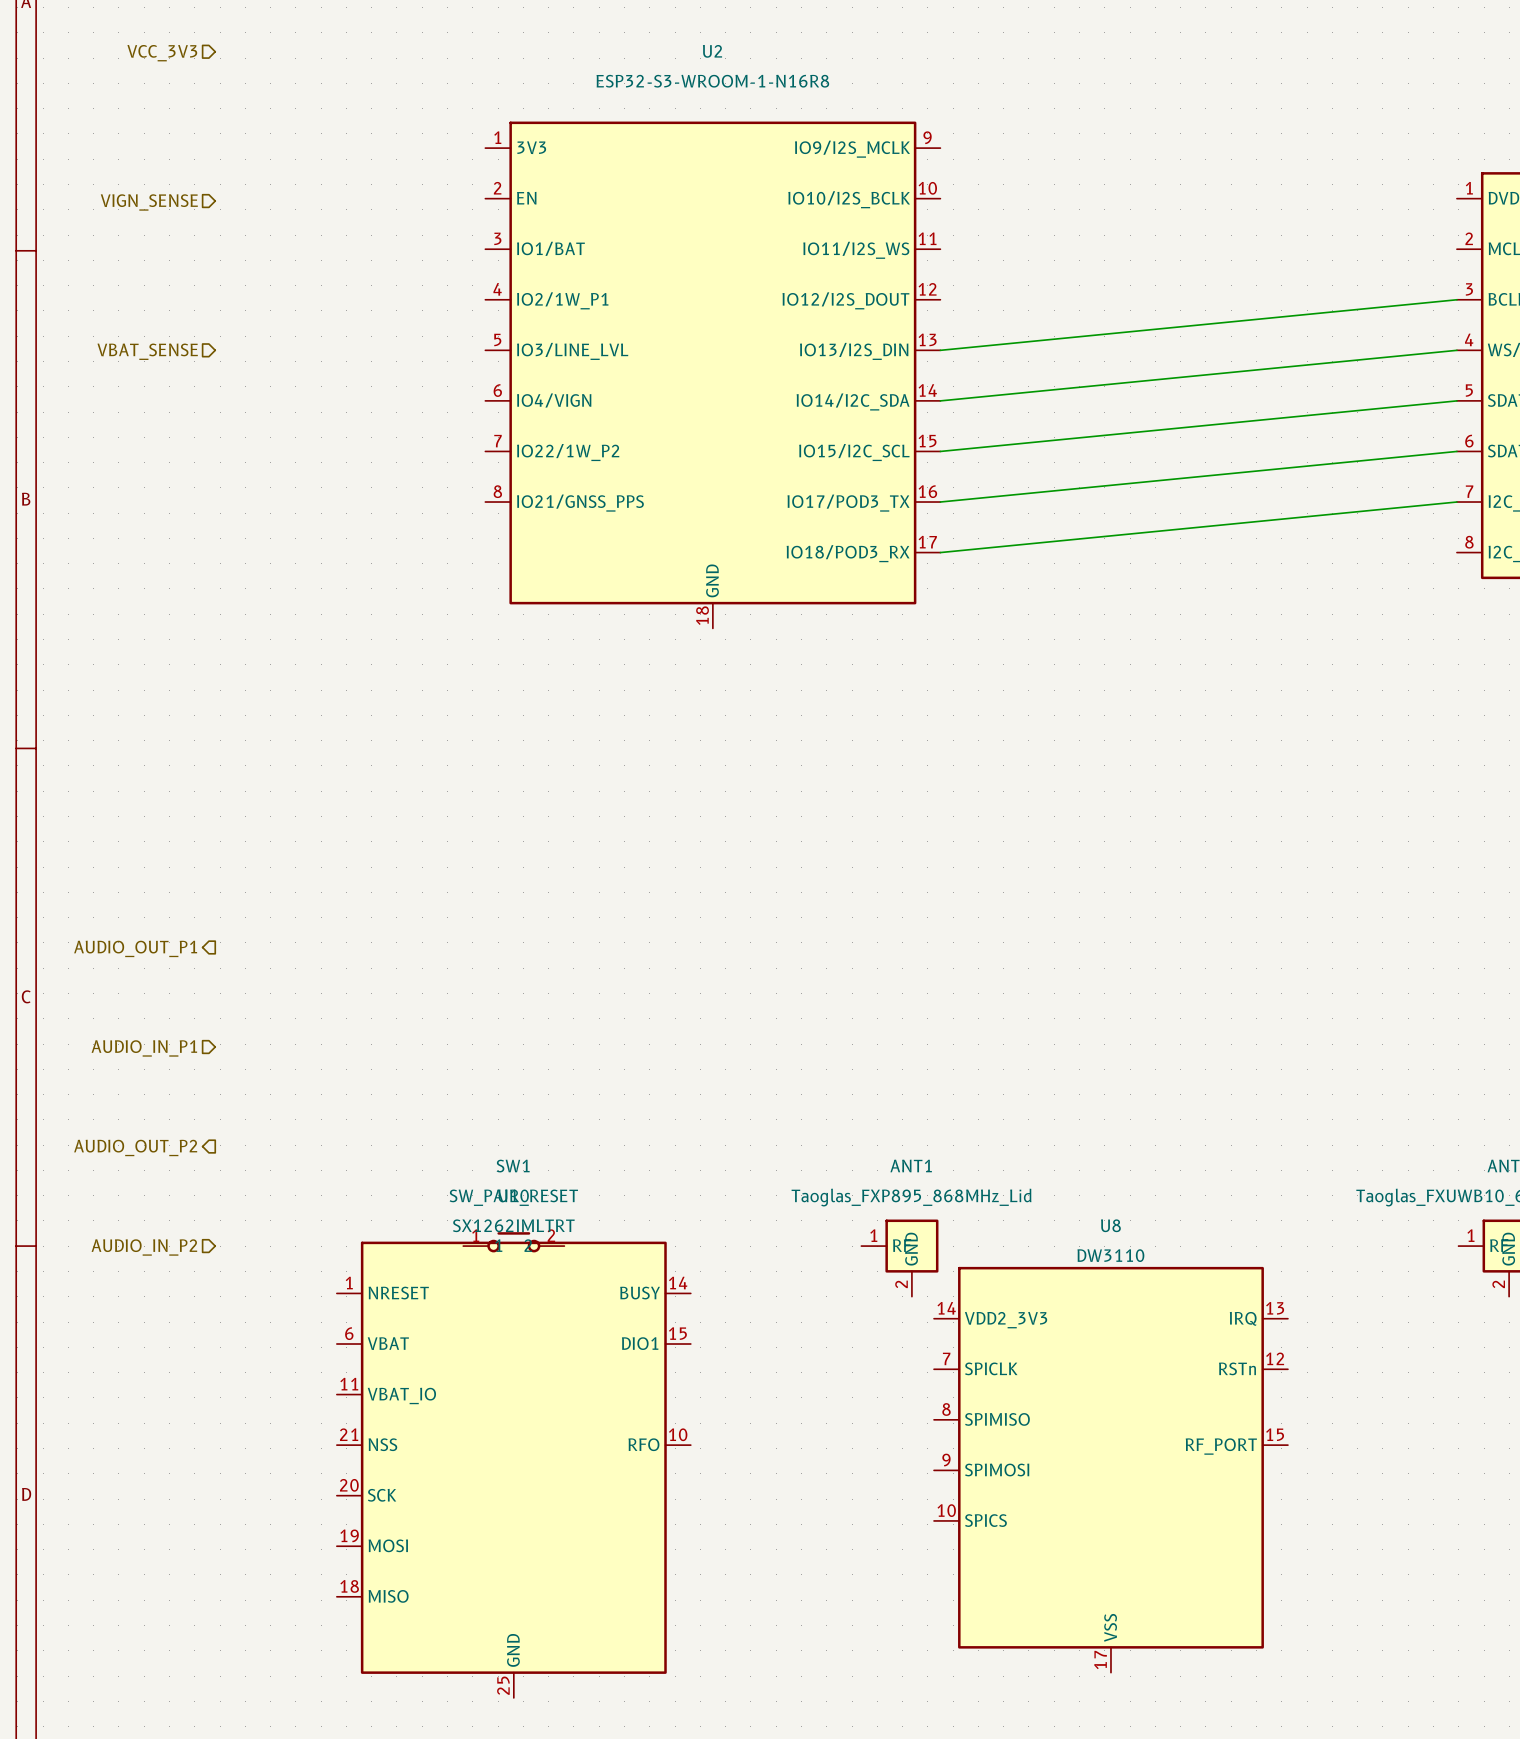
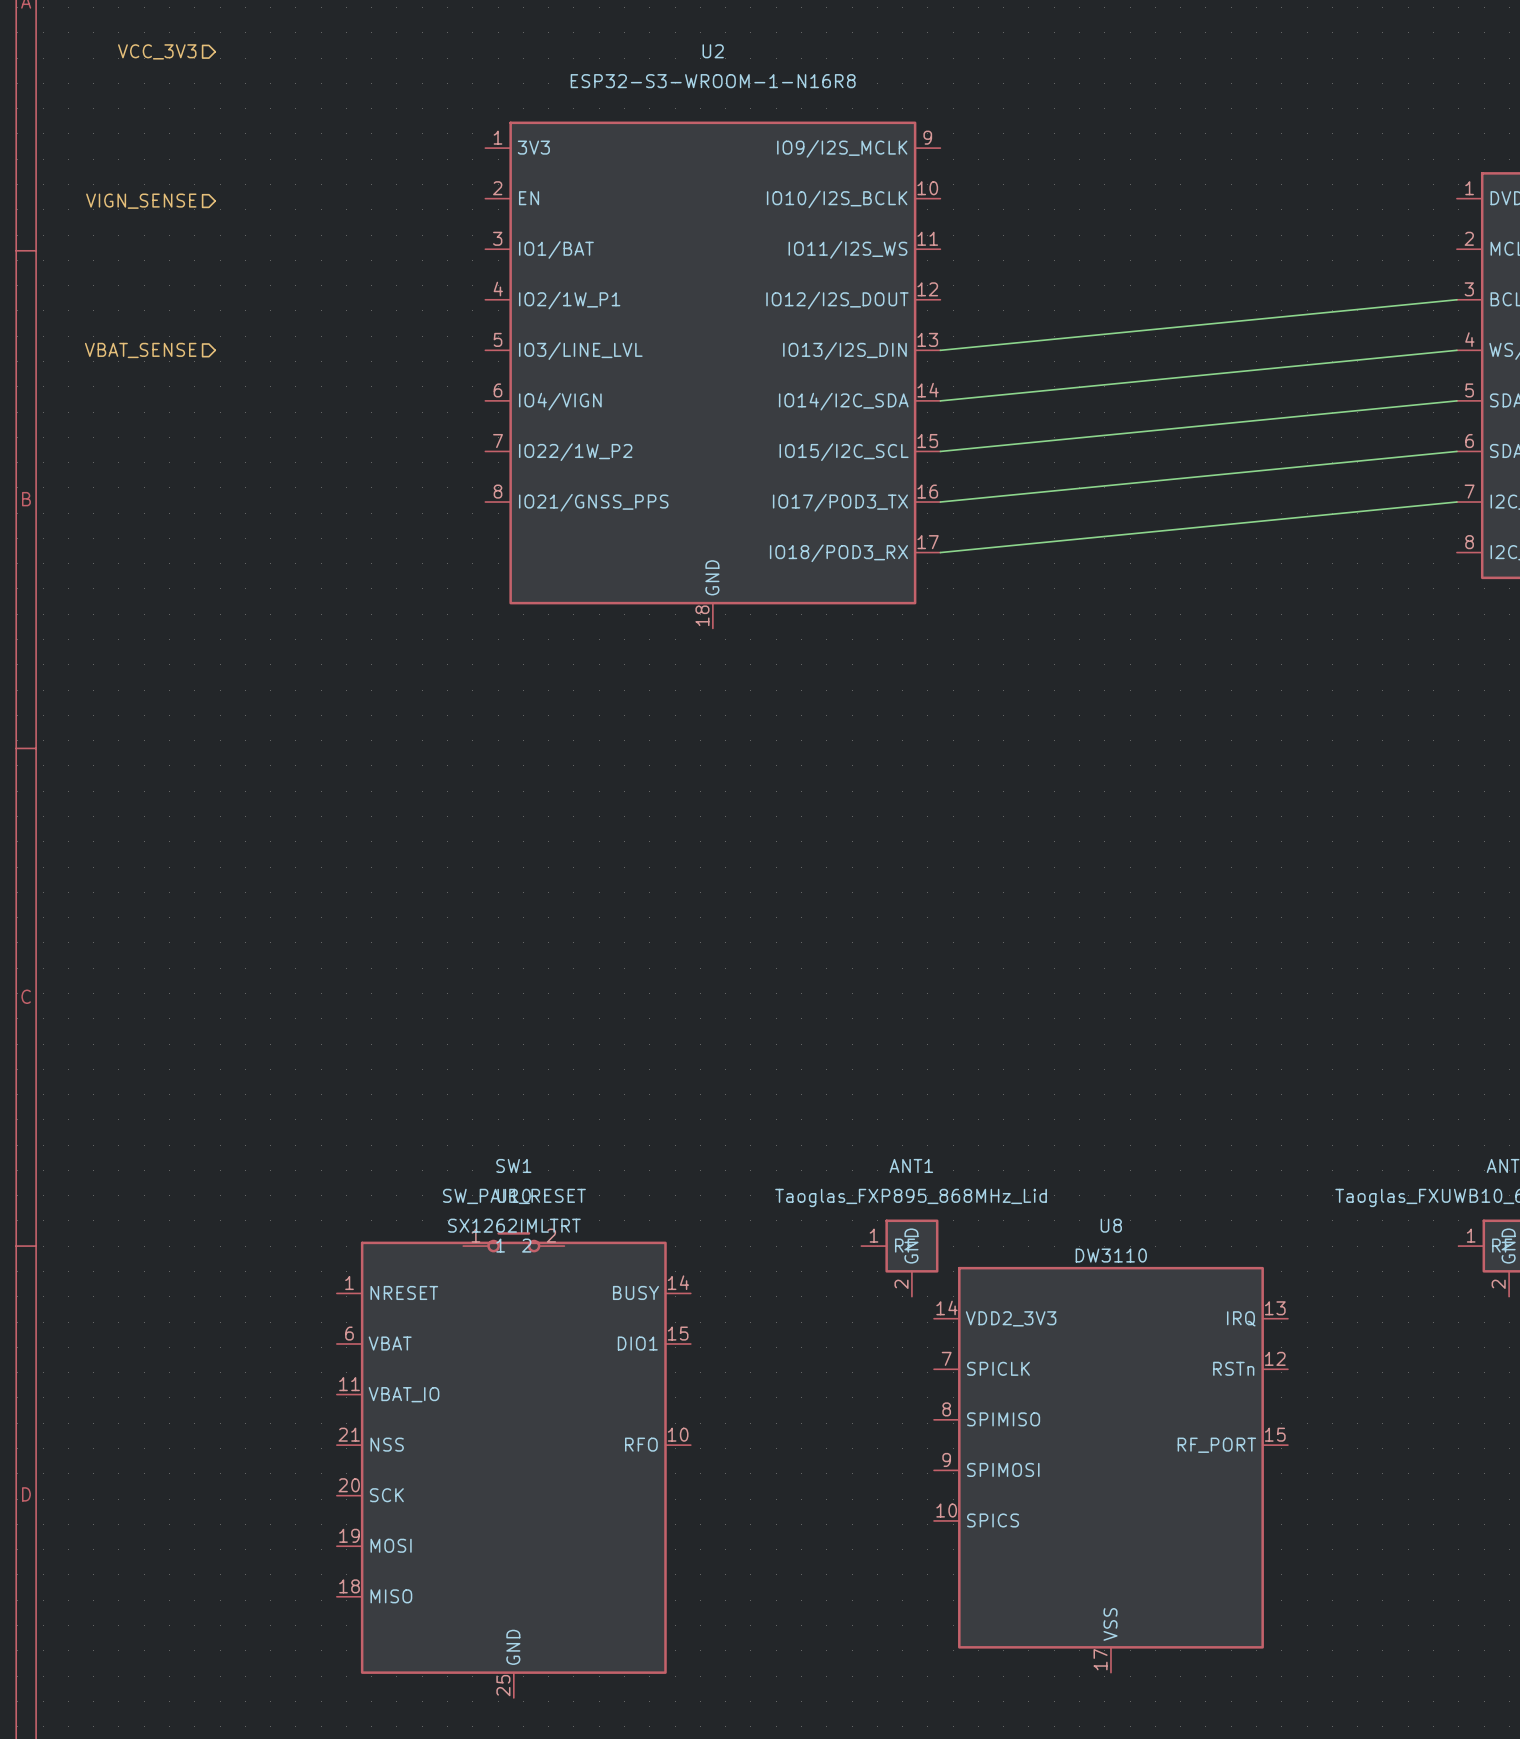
hierarchical label: AUDIO_OUT_P1 (135, 948) -> none
hierarchical label: AUDIO_IN_P1 (144, 1048) -> none
hierarchical label: AUDIO_OUT_P2 (135, 1147) -> none
hierarchical label: AUDIO_IN_P2 (144, 1247) -> none

